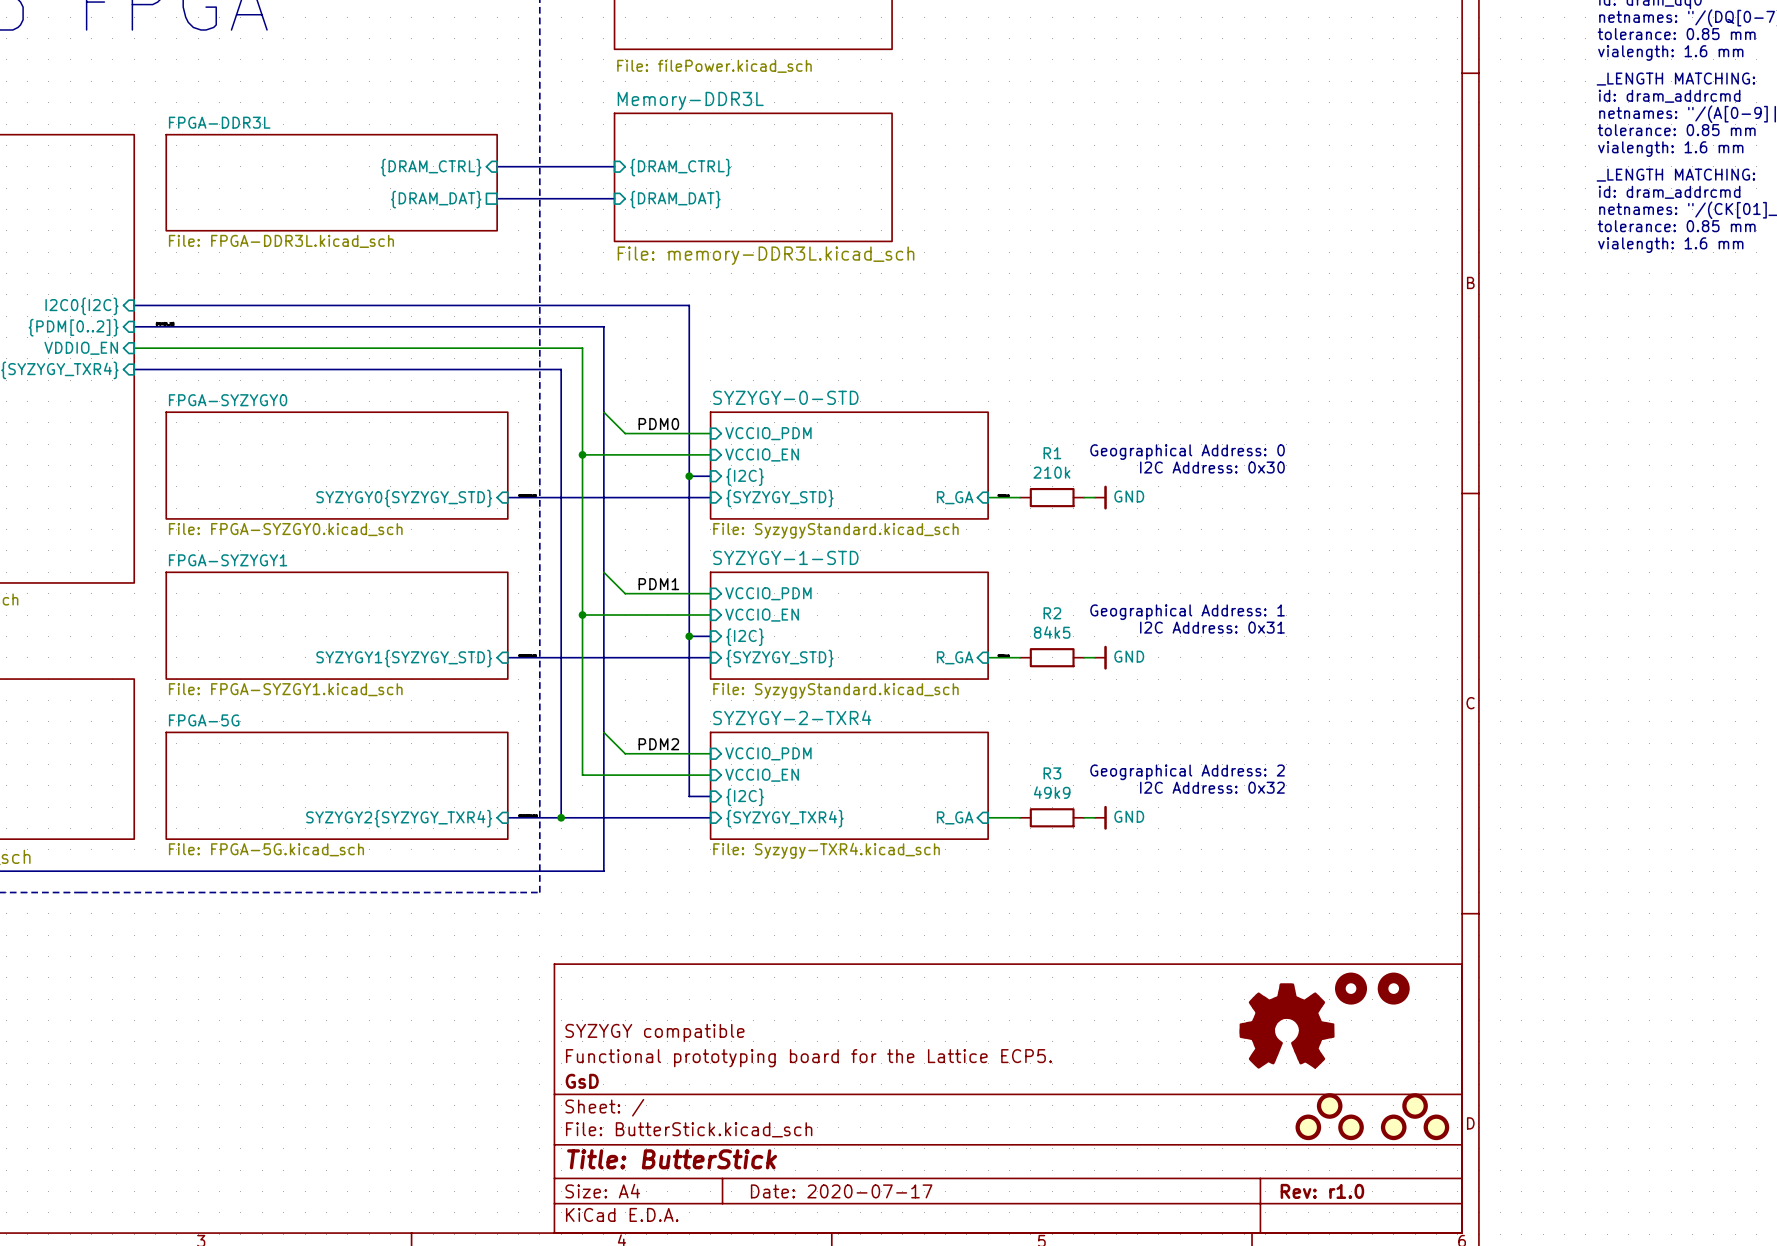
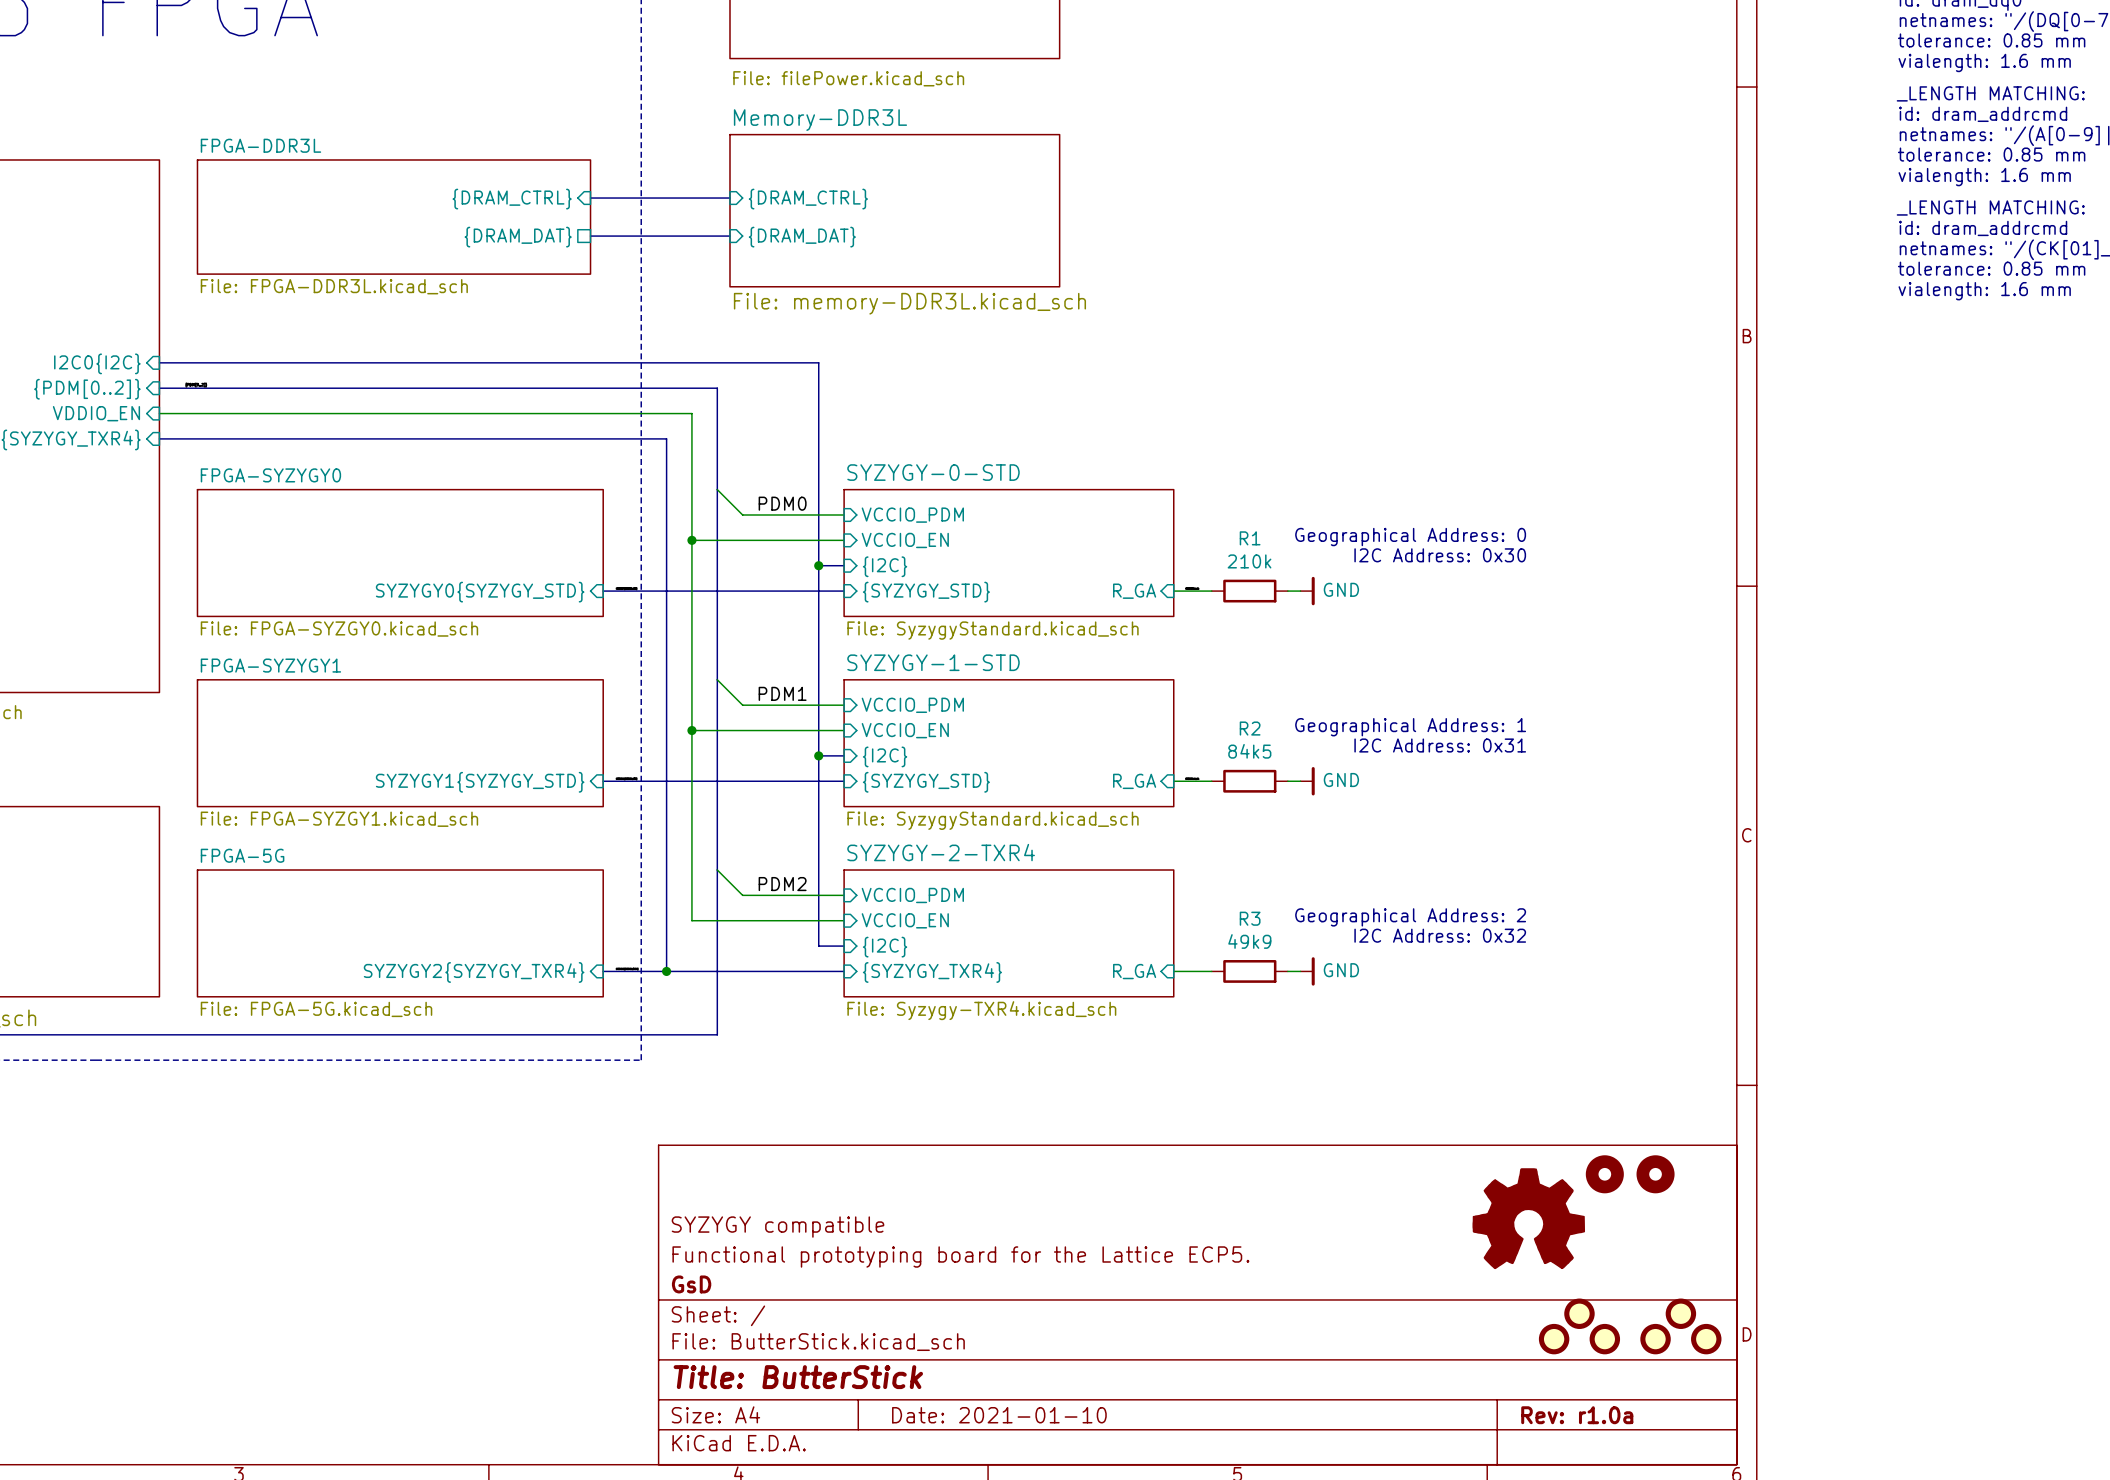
title block: Date: 2020-07-17 (841, 1191) -> Date: 2021-01-10 (999, 1415)
title block: Rev: r1.0 (1322, 1191) -> Rev: r1.0a (1577, 1415)

